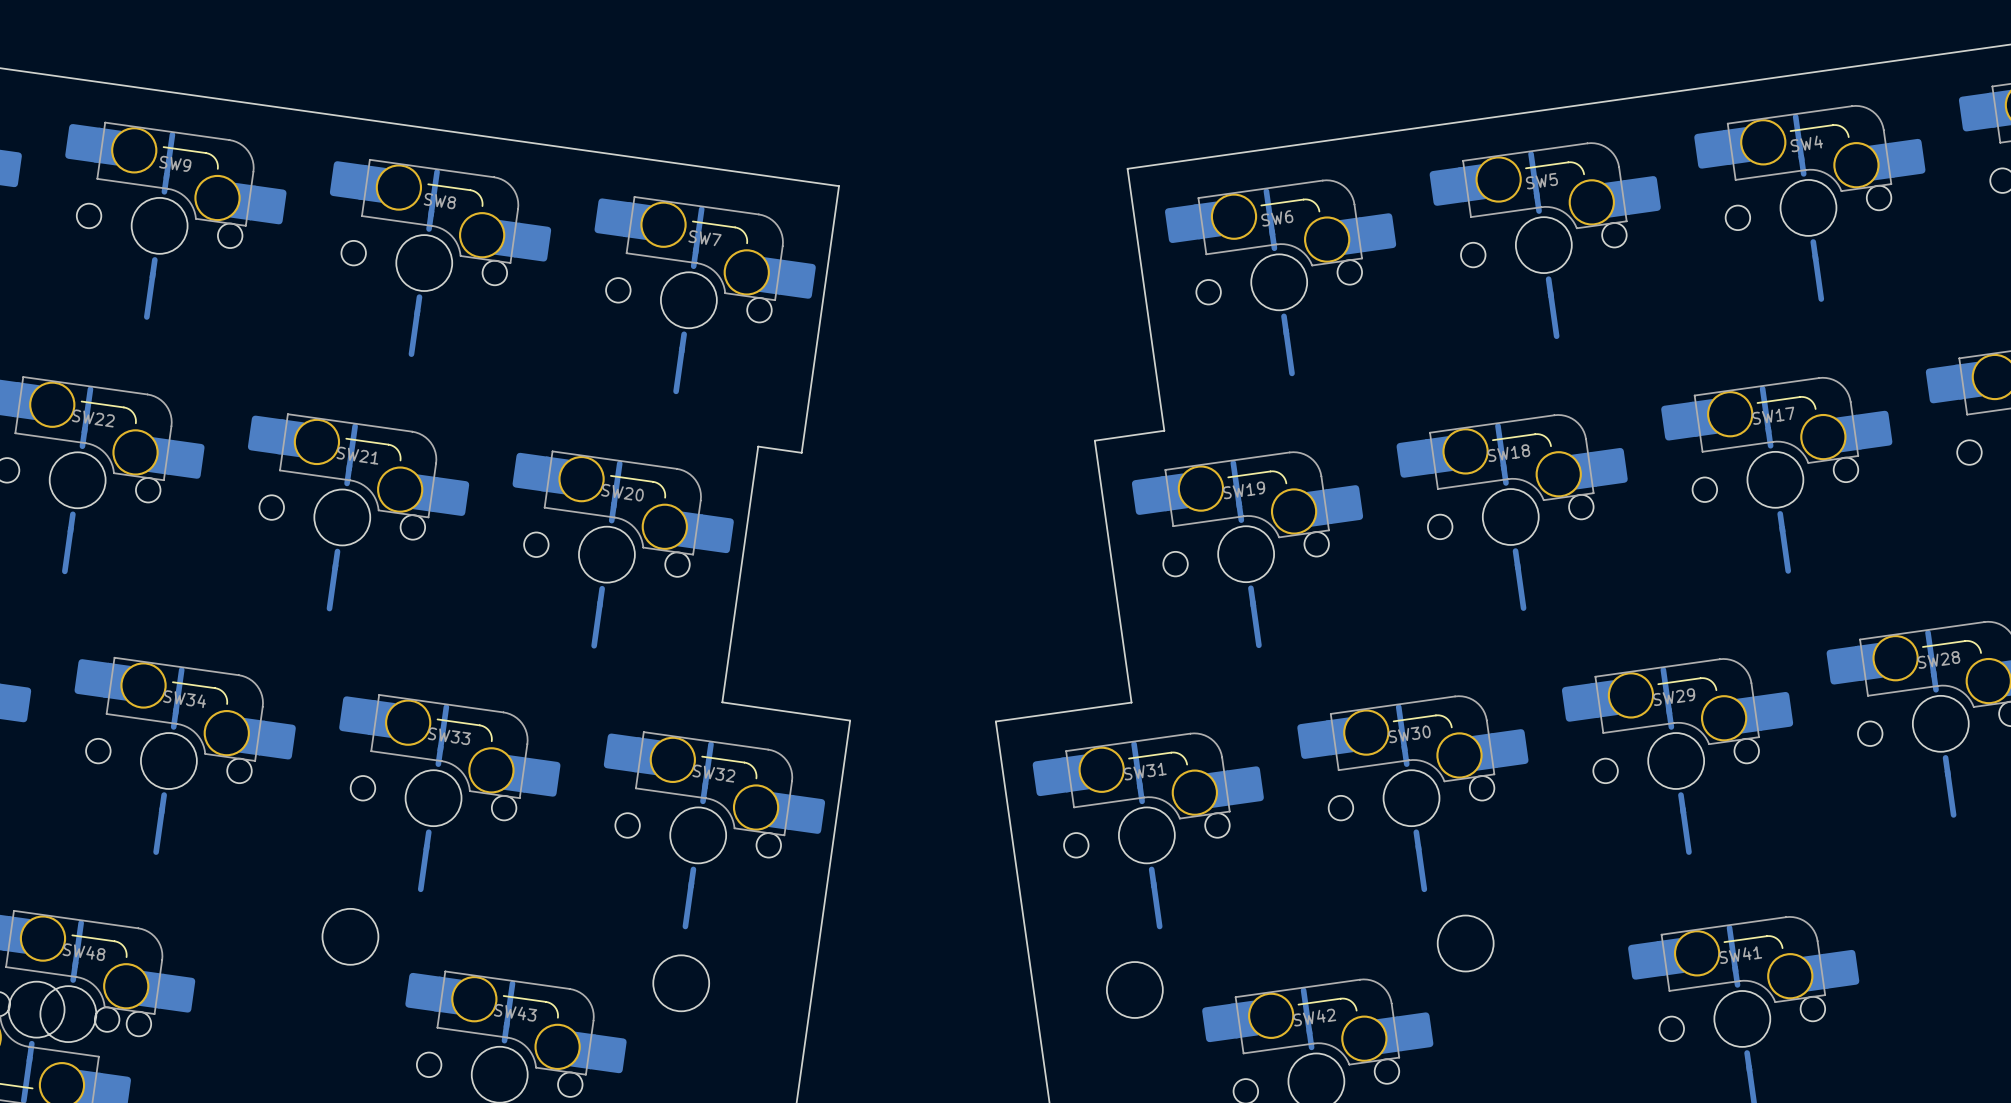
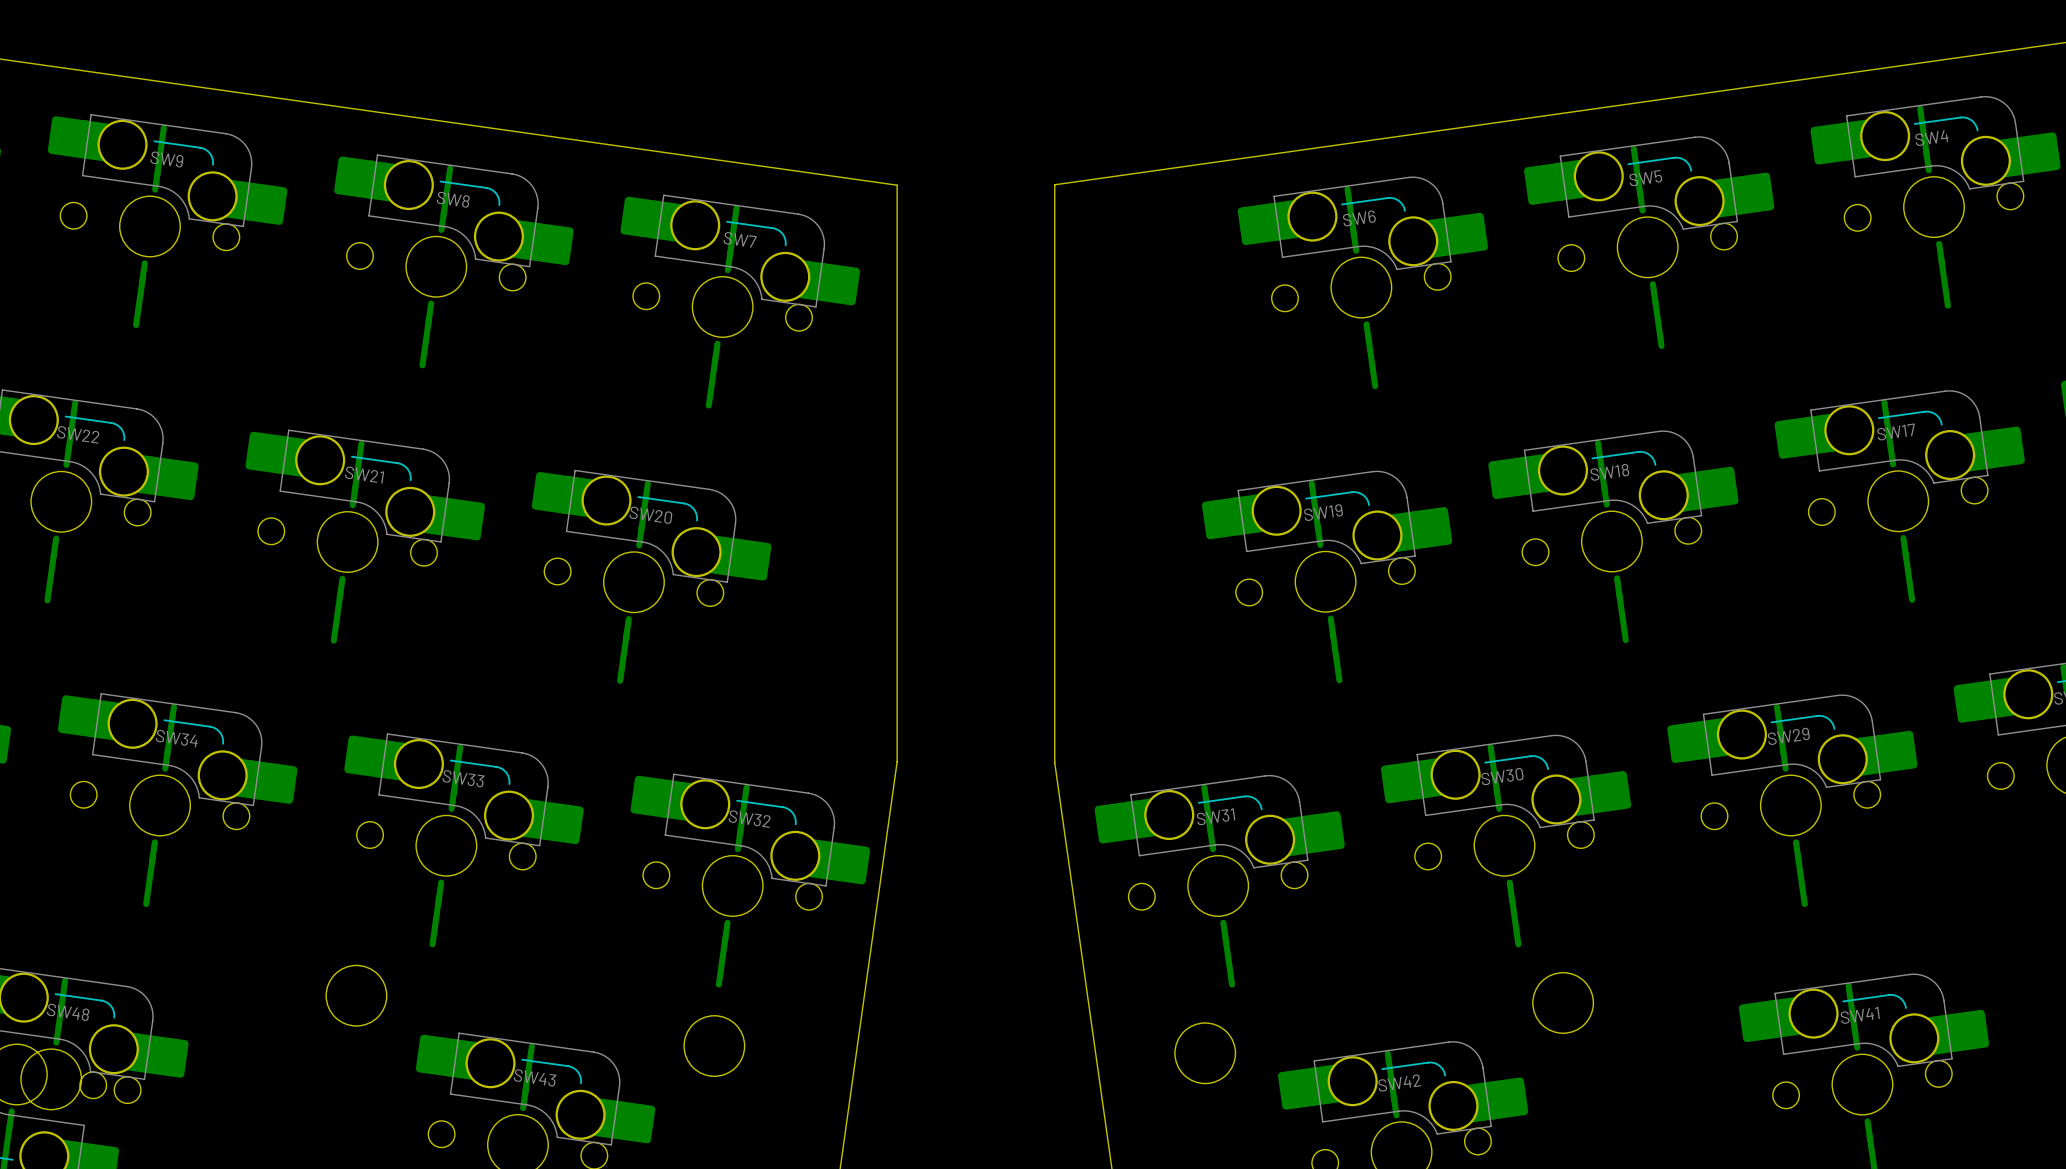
board edge: (1127, 168) (1164, 430) (1094, 440) (1131, 702) (995, 721) -> (1197, 164) (1054, 184) (1054, 762)
board edge: (839, 186) (801, 452) (758, 446) (722, 702) (850, 720) -> (885, 183) (897, 185) (897, 761)

